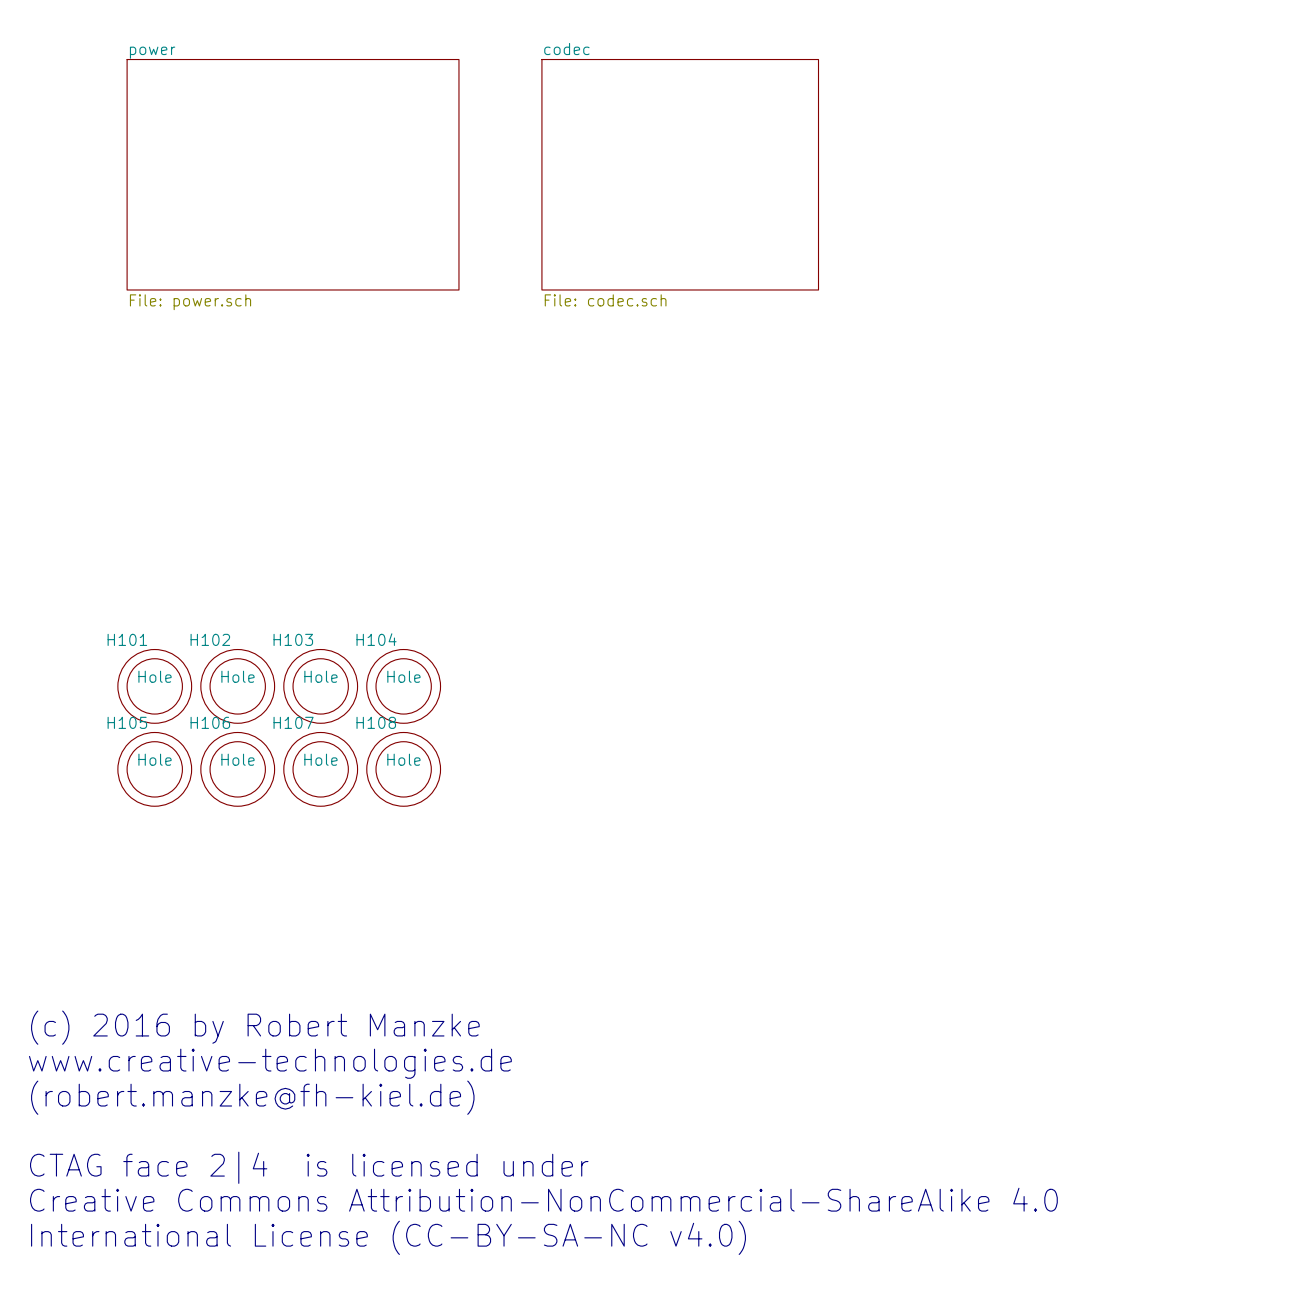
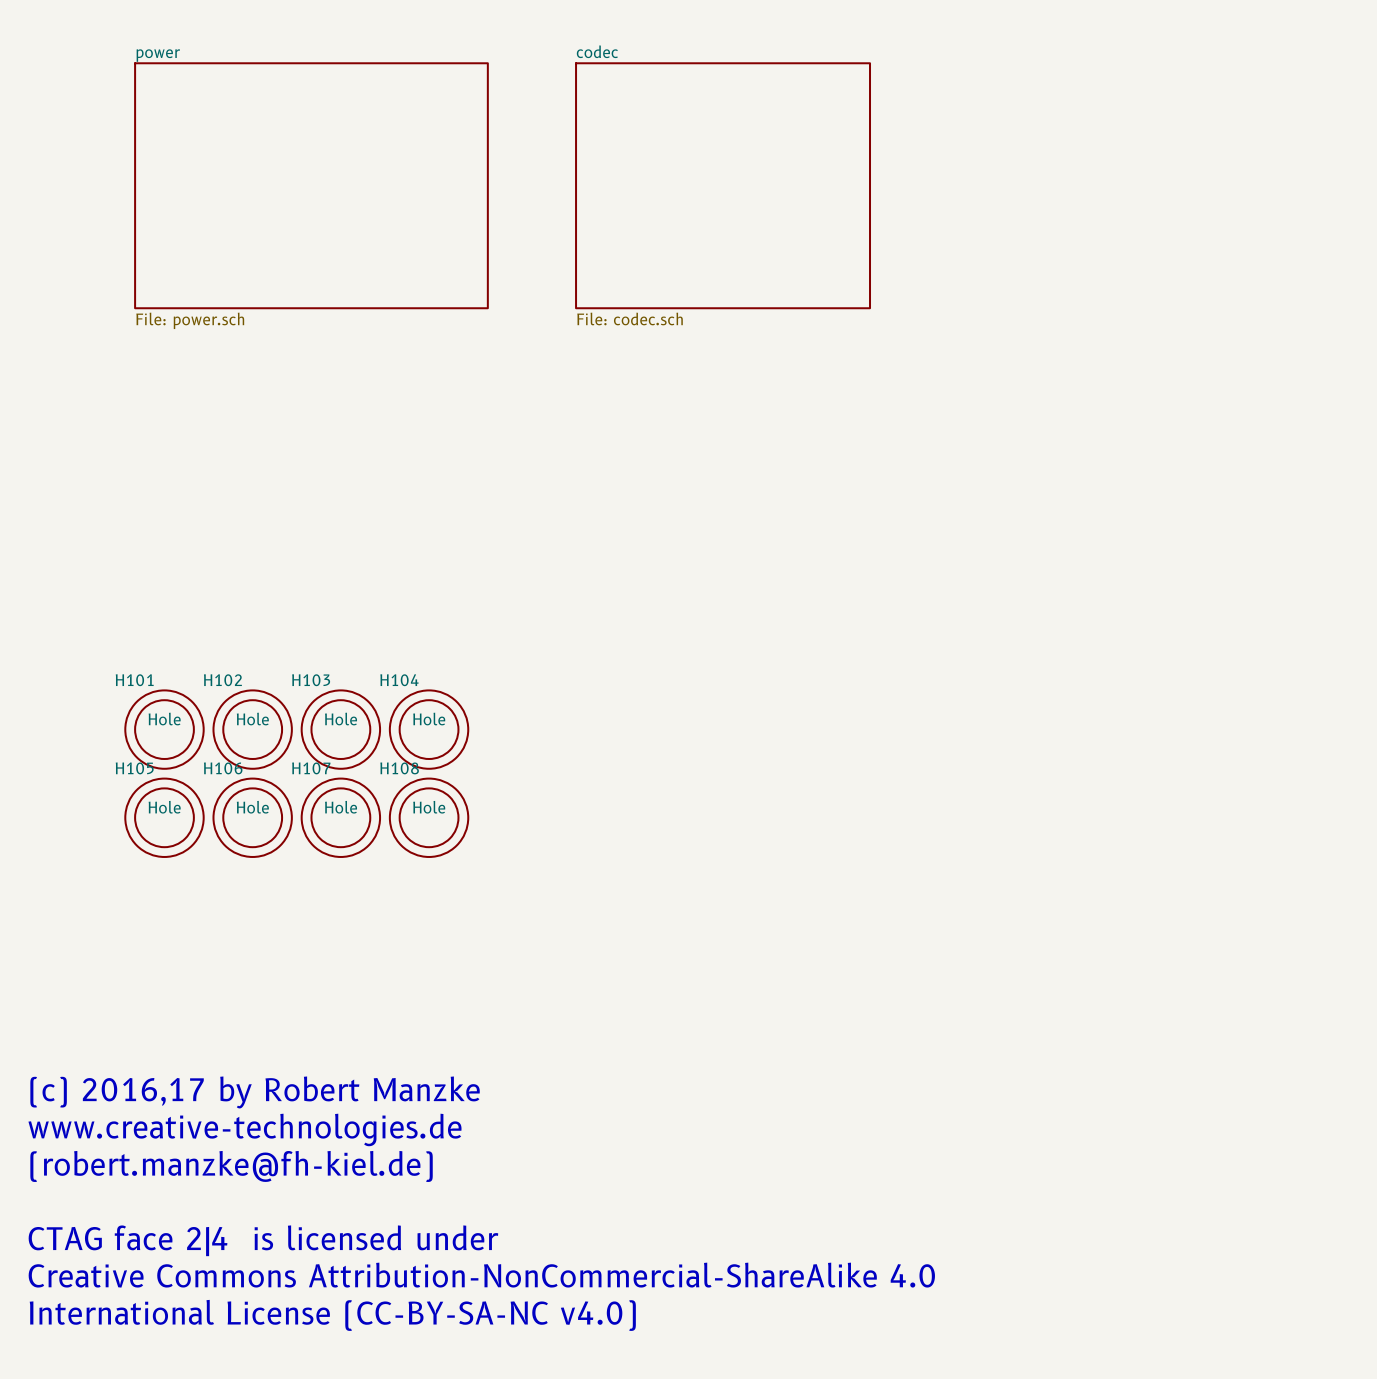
text: (c) 2016 by Robert Manzke (255, 1027) -> (c) 2016,17 by Robert Manzke (255, 1092)

